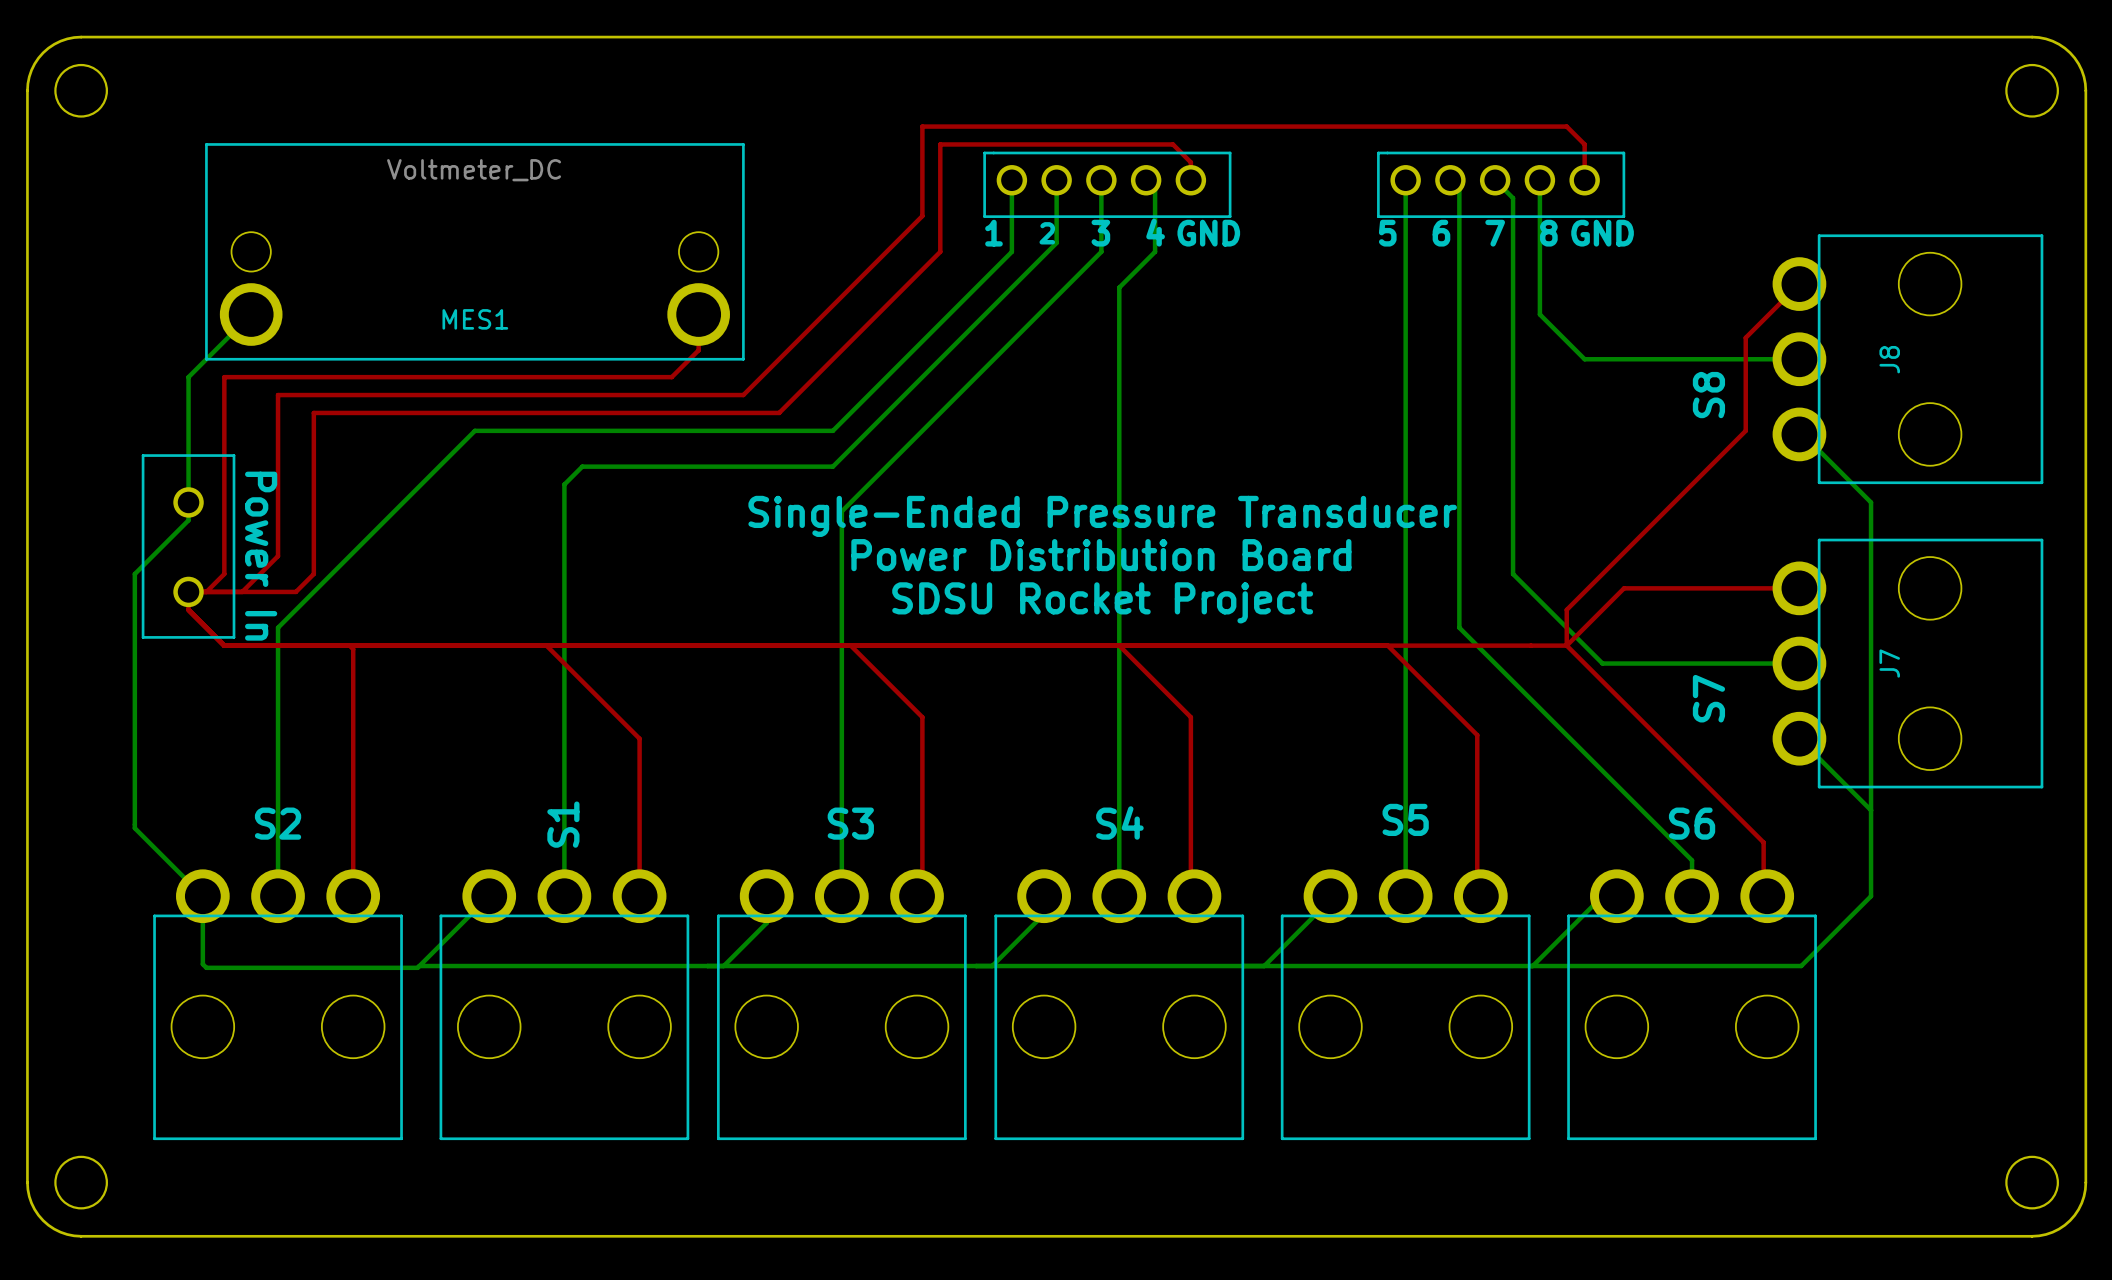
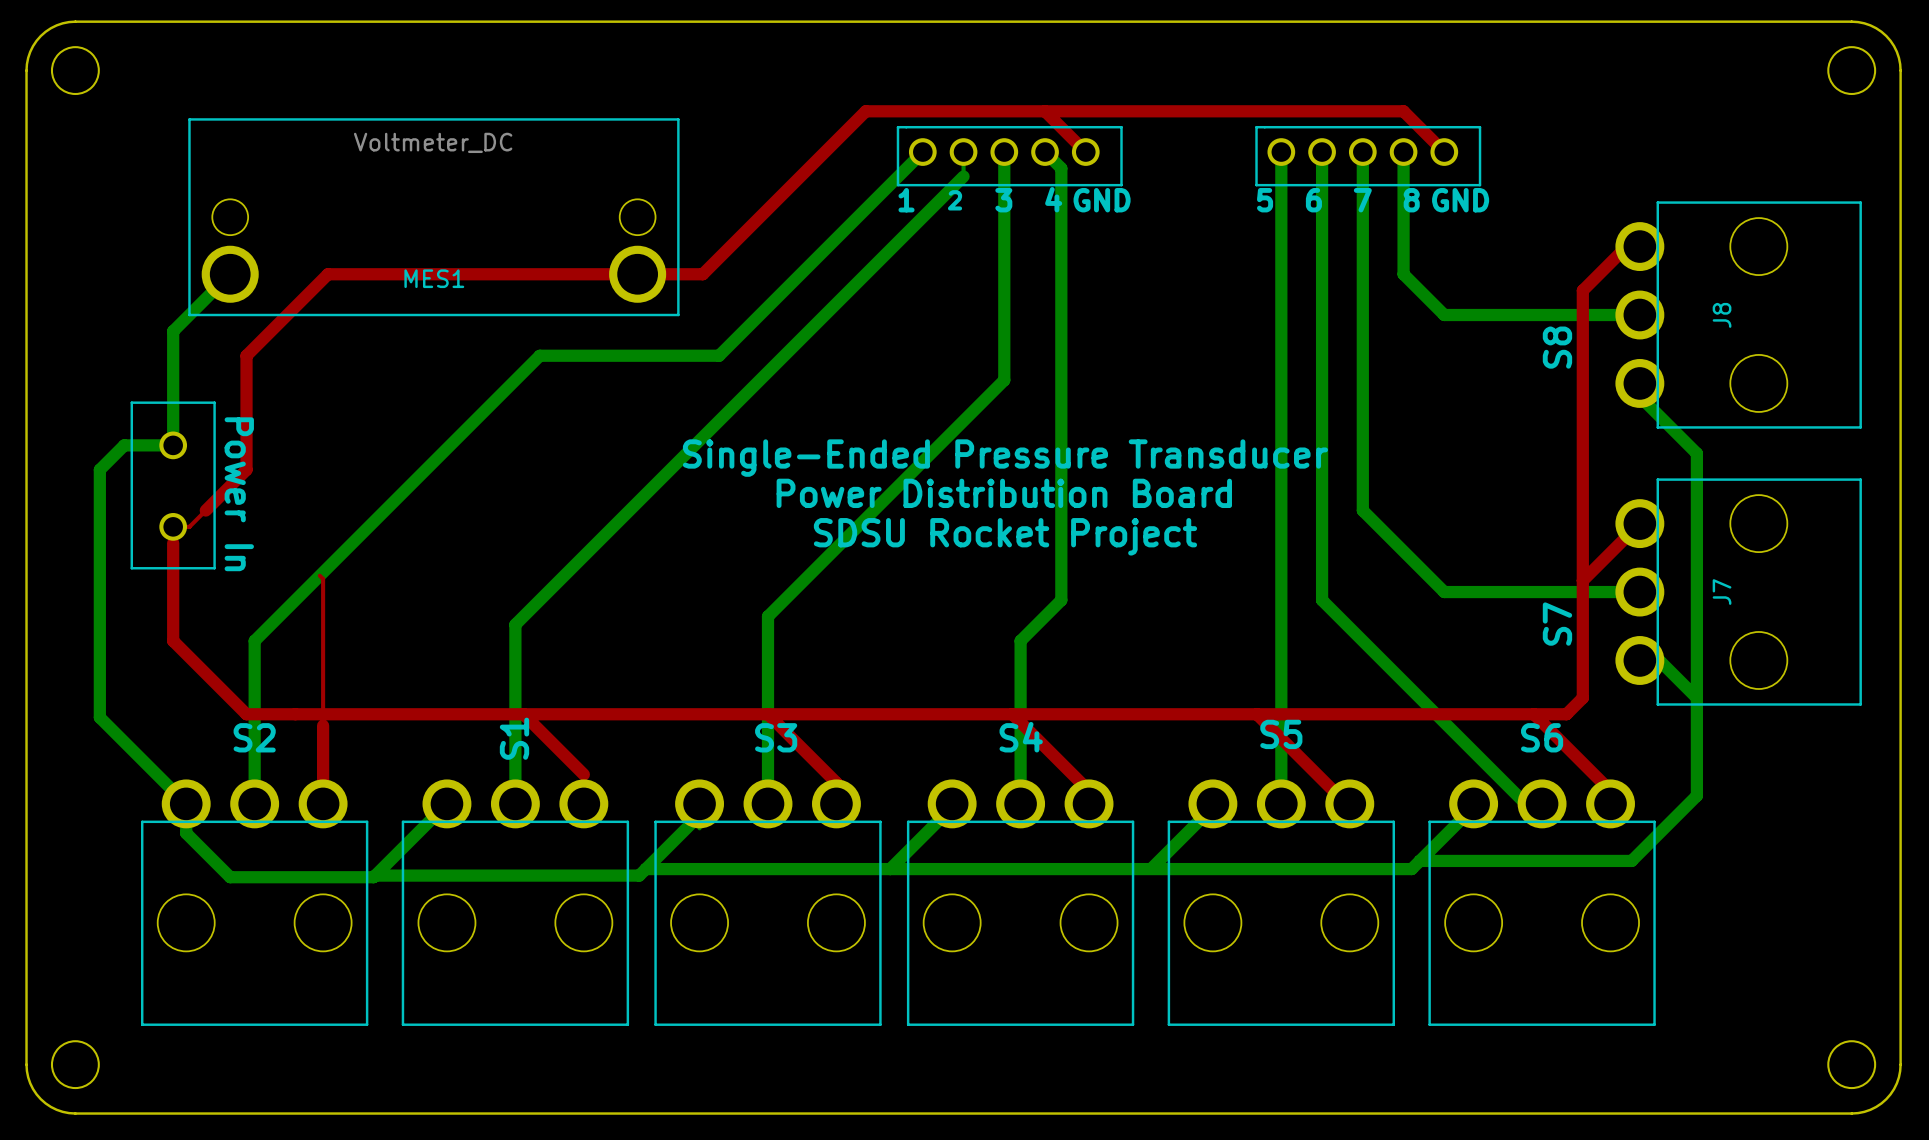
bottom track: (1011, 180) (1011, 251) -> (963, 176) (922, 217)
bottom track: none -> (922, 152) (719, 355) (539, 355) (254, 640)
bottom track width: thin (1101, 180) (1101, 251) -> thick (1004, 152) (1004, 217)
top track: (1190, 180) (1190, 162) (1172, 144) (940, 144) (940, 251) (779, 412) (313, 412) (313, 574) (295, 591) (206, 591) -> (1085, 152) (1045, 111)
bottom track width: thin (1405, 180) (1405, 896) -> thick (1281, 152) (1281, 803)
bottom track: (1495, 180) (1513, 198) (1513, 574) (1602, 663) -> (1362, 152) (1362, 510) (1444, 592) (1460, 592)
bottom track width: thin (1539, 180) (1539, 314) (1584, 359) (1799, 359) -> thick (1403, 152) (1403, 274) (1444, 315) (1639, 315)
top track: (1584, 180) (1584, 144) (1566, 126) (922, 126) (922, 216) (743, 395) (278, 395) (278, 556) (242, 591) -> (1444, 152) (1403, 111) (865, 111) (702, 274) (328, 274) (246, 355) (246, 469) (205, 510)
bottom track: (1155, 189) (1155, 251) (1119, 287) (1119, 717) -> (1045, 152) (1061, 168) (1061, 600) (1020, 640)
bottom track: (1459, 189) (1459, 627) (1692, 860) (1692, 896) -> (1322, 152) (1322, 600) (1525, 803) (1542, 803)
bottom track: (1056, 207) (1056, 242) (832, 466) (582, 466) (564, 484) (564, 699) -> none
bottom track width: thin (1011, 251) (832, 430) -> thick (922, 217) (759, 380)
bottom track: (1101, 251) (841, 511) (841, 690) -> (1004, 217) (1004, 380) (768, 616)
top track: (1799, 284) (1745, 337) (1745, 430) (1566, 609) (1566, 645) -> none
bottom track width: thin (251, 314) (188, 377) (188, 502) -> thick (230, 274) (173, 331) (173, 445)
top track: (698, 314) (698, 350) (671, 377) (224, 377) (224, 574) -> none
bottom track: (832, 430) (474, 430) (278, 627) (278, 717) -> (759, 380) (515, 624)
bottom track: none -> (1639, 383) (1639, 396) (1696, 453) (1696, 795) (1631, 860) (1419, 860)
bottom track: (1803, 434) (1871, 502) (1871, 896) (1801, 966) (419, 966) -> none
bottom track: (188, 502) (188, 520) (134, 574) (134, 828) -> (173, 445) (124, 445) (99, 469) (99, 717) (124, 741)
top track: (1799, 588) (1624, 588) (1566, 645) -> (1639, 523) (1582, 580)
top track: (188, 609) (224, 645) (1566, 645) -> (173, 543) (173, 640) (246, 714) (1566, 714) (1582, 697) (1582, 290) (1626, 246) (1639, 246)
top track: (546, 645) (639, 738) (639, 864) -> (523, 714) (583, 774)
top track: (850, 645) (922, 717) (922, 890) -> none
top track: (1119, 645) (1190, 717) (1190, 892) -> none
top track: (1387, 645) (1477, 735) (1477, 892) -> none
top track: (1566, 645) (1763, 842) (1763, 892) -> none
bottom track width: thin (1602, 663) (1799, 663) -> thick (1460, 592) (1639, 592)
bottom track width: thin (841, 690) (841, 896) -> thick (768, 616) (768, 803)
bottom track width: thin (564, 699) (564, 896) -> thick (515, 624) (515, 803)
bottom track width: thin (278, 717) (278, 896) -> thick (254, 640) (254, 803)
bottom track width: thin (1119, 717) (1119, 896) -> thick (1020, 640) (1020, 803)
bottom track: (1799, 738) (1871, 810) -> (1639, 660) (1659, 660) (1696, 697)
top track: none -> (768, 714) (836, 782) (836, 803)
top track: none -> (1012, 714) (1089, 790) (1089, 803)
top track: none -> (1256, 714) (1346, 803) (1349, 803)
top track: none -> (1533, 714) (1610, 790) (1610, 803)
top track width: thin (353, 810) (353, 896) -> thick (323, 725) (323, 803)
bottom track width: thin (134, 828) (202, 896) (202, 928) -> thick (124, 741) (186, 803) (186, 833)
bottom track width: thin (489, 896) (417, 967) -> thick (446, 803) (381, 869)
bottom track: none -> (699, 803) (699, 815) (639, 875) (375, 875)
bottom track: none -> (952, 803) (952, 807) (890, 869)
bottom track: (1602, 896) (1532, 966) -> none
bottom track: none -> (1473, 803) (1473, 807) (1411, 869) (645, 869)
bottom track width: thin (1330, 899) (1264, 966) -> thick (1212, 807) (1152, 867)
bottom track: (1044, 914) (992, 966) -> none
bottom track: (766, 923) (723, 966) -> none
bottom track: (202, 928) (202, 964) (206, 967) (417, 967) -> (186, 833) (230, 877) (373, 877) (381, 869)

